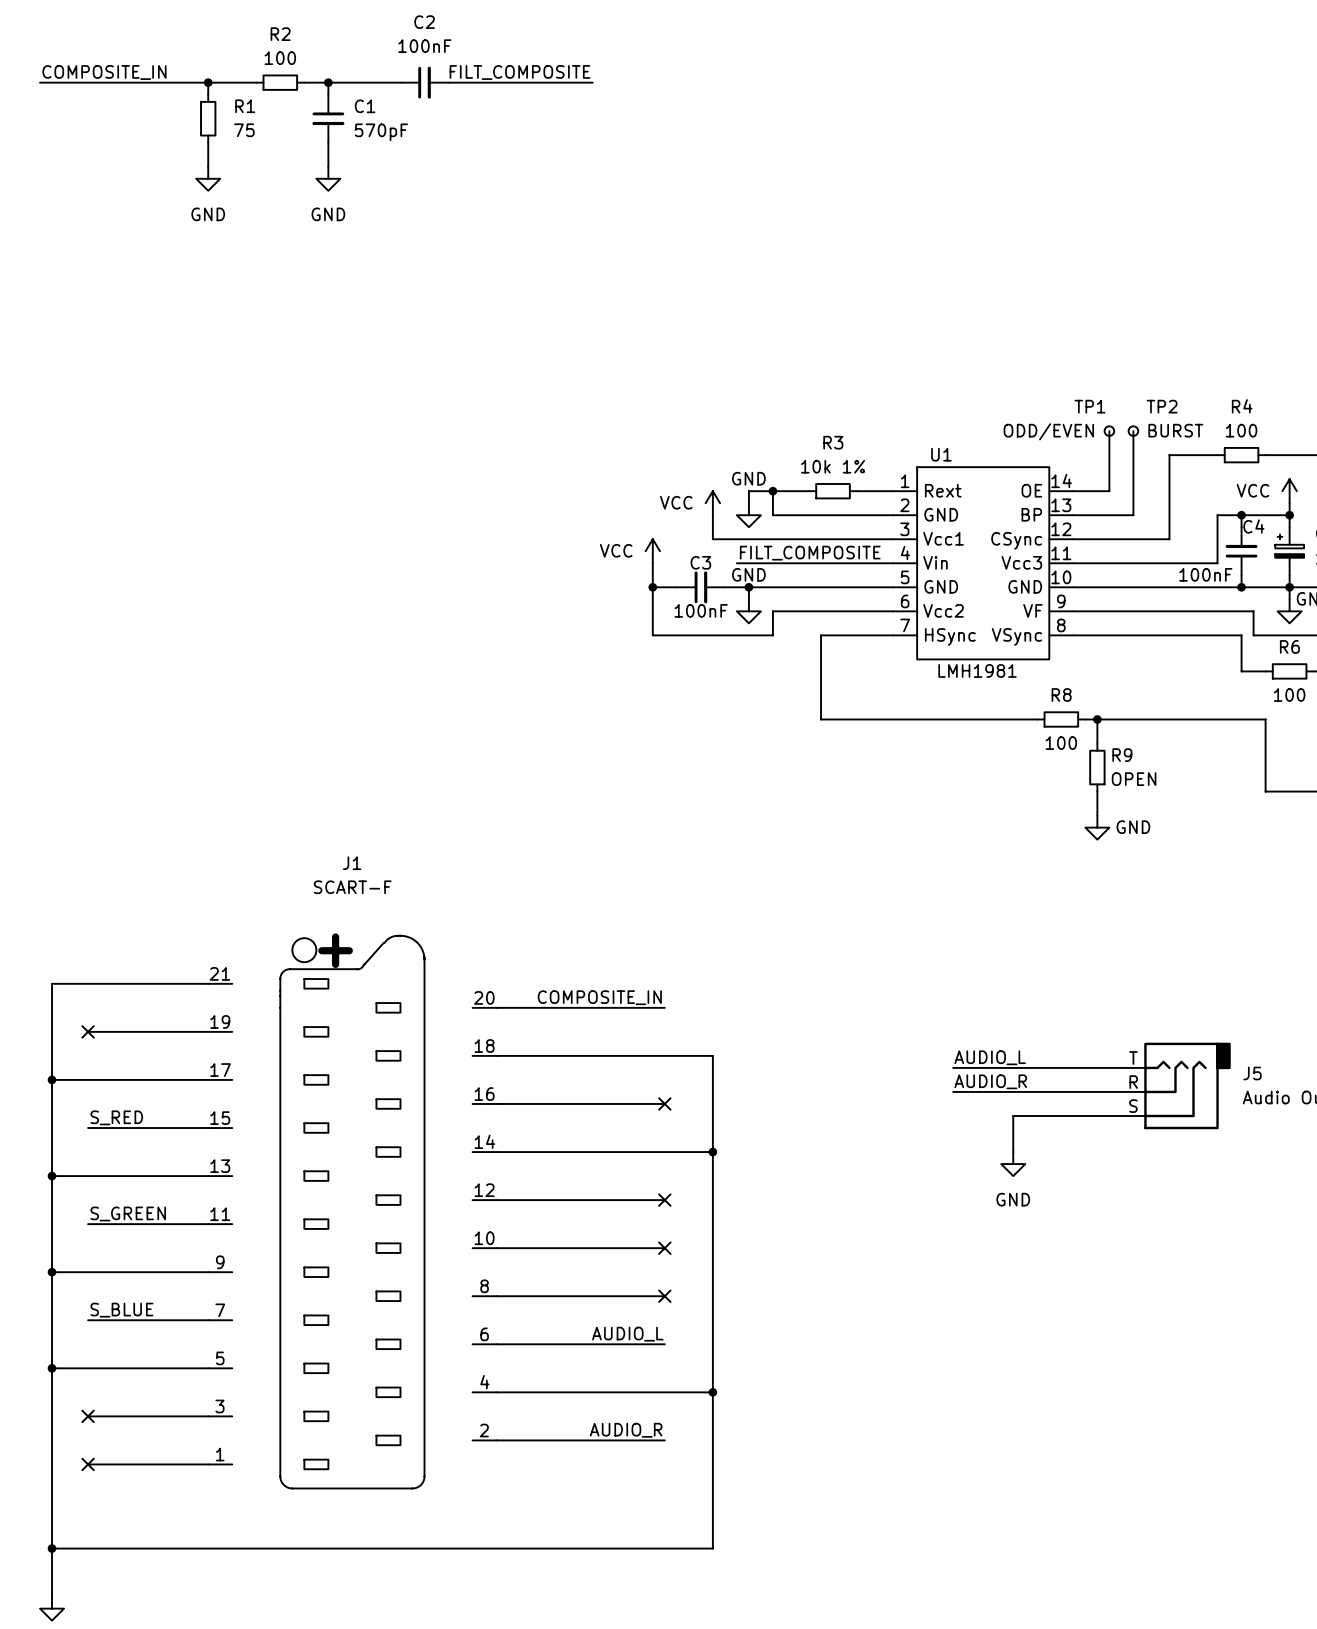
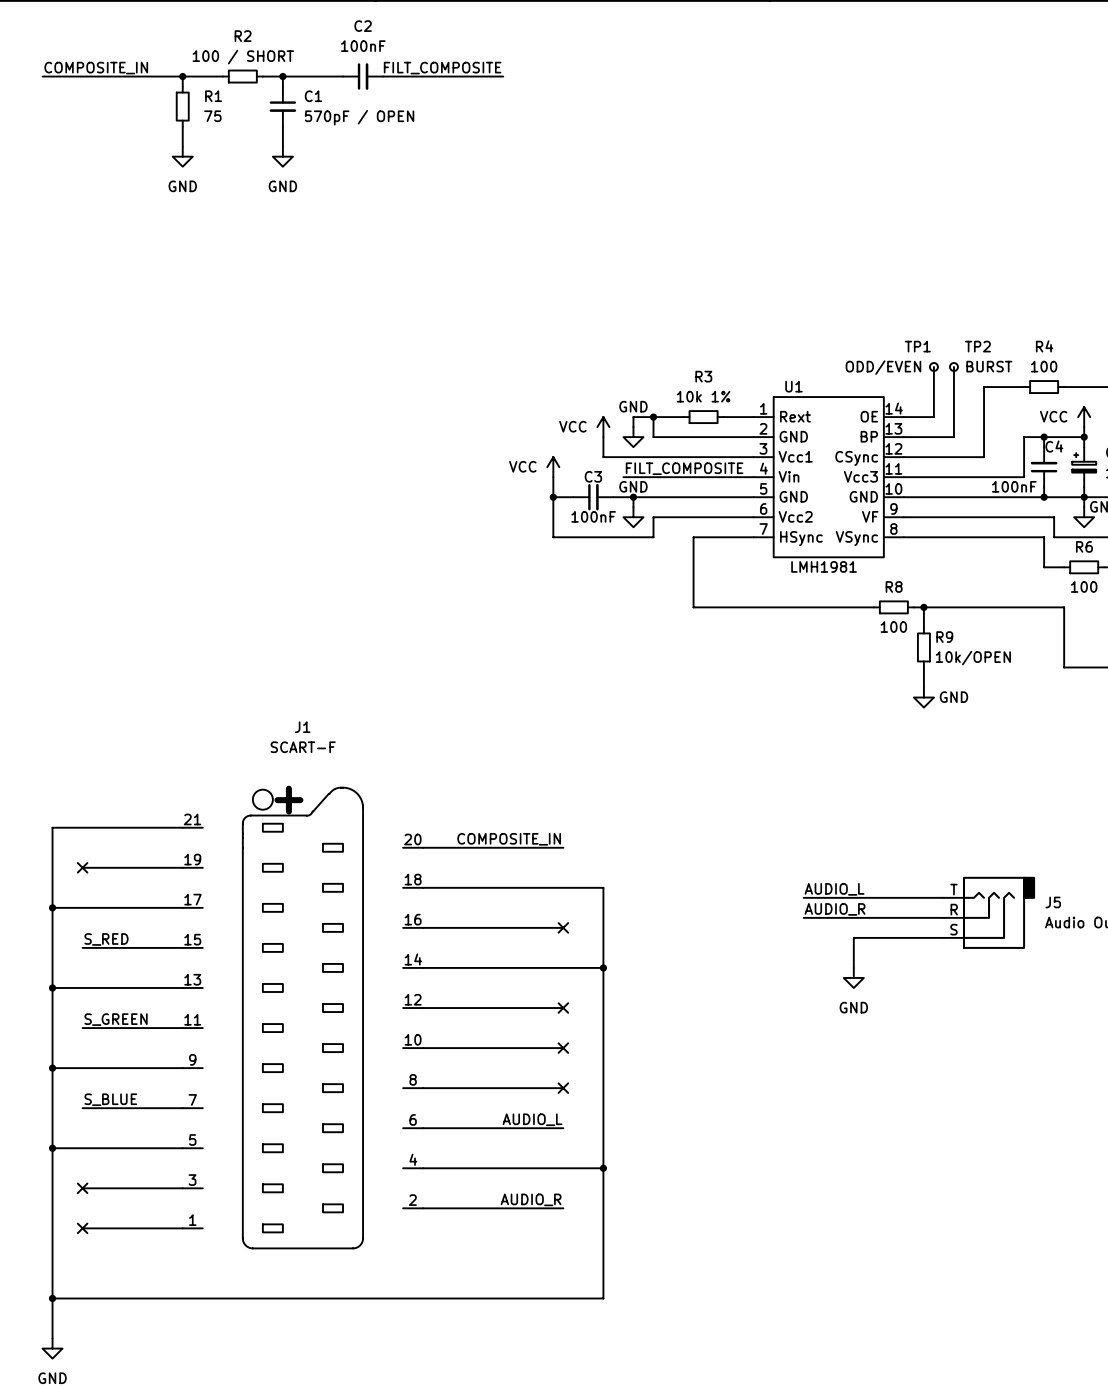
R2 value: 100 (280, 58) -> 100 / SHORT (243, 57)
C1 value: 570pF (381, 132) -> 570pF / OPEN (359, 117)
R9 value: OPEN (1134, 779) -> 10k/OPEN (973, 658)

